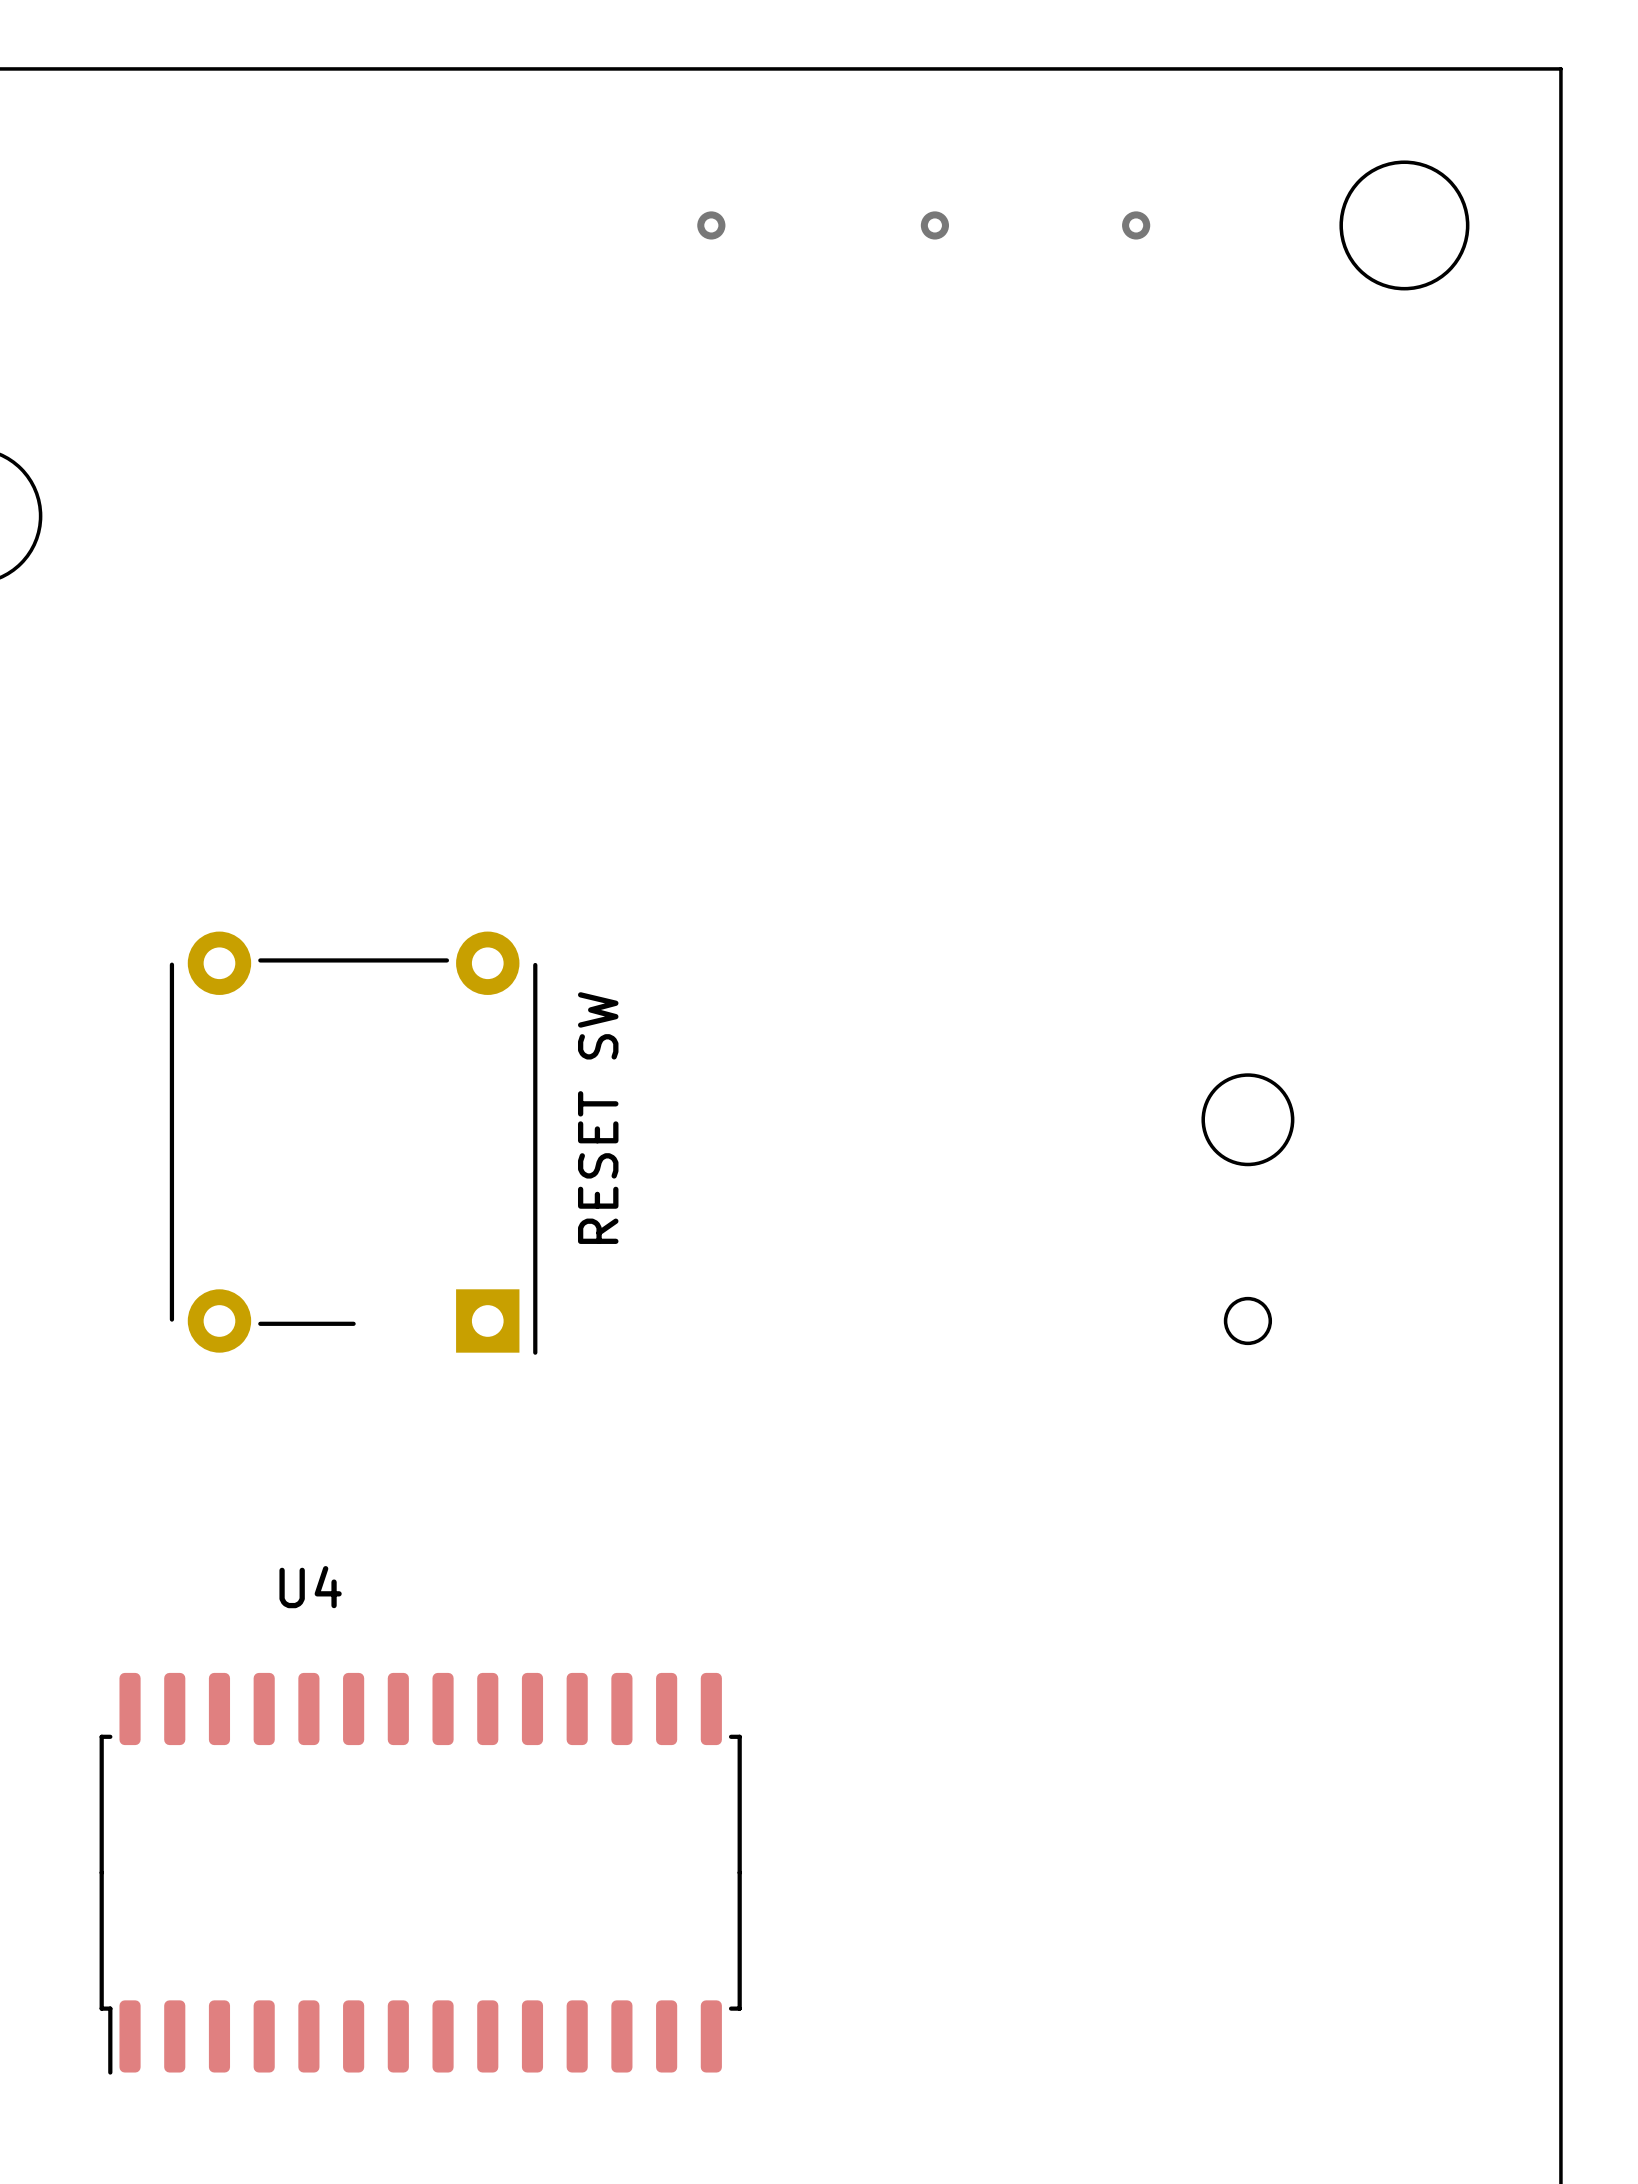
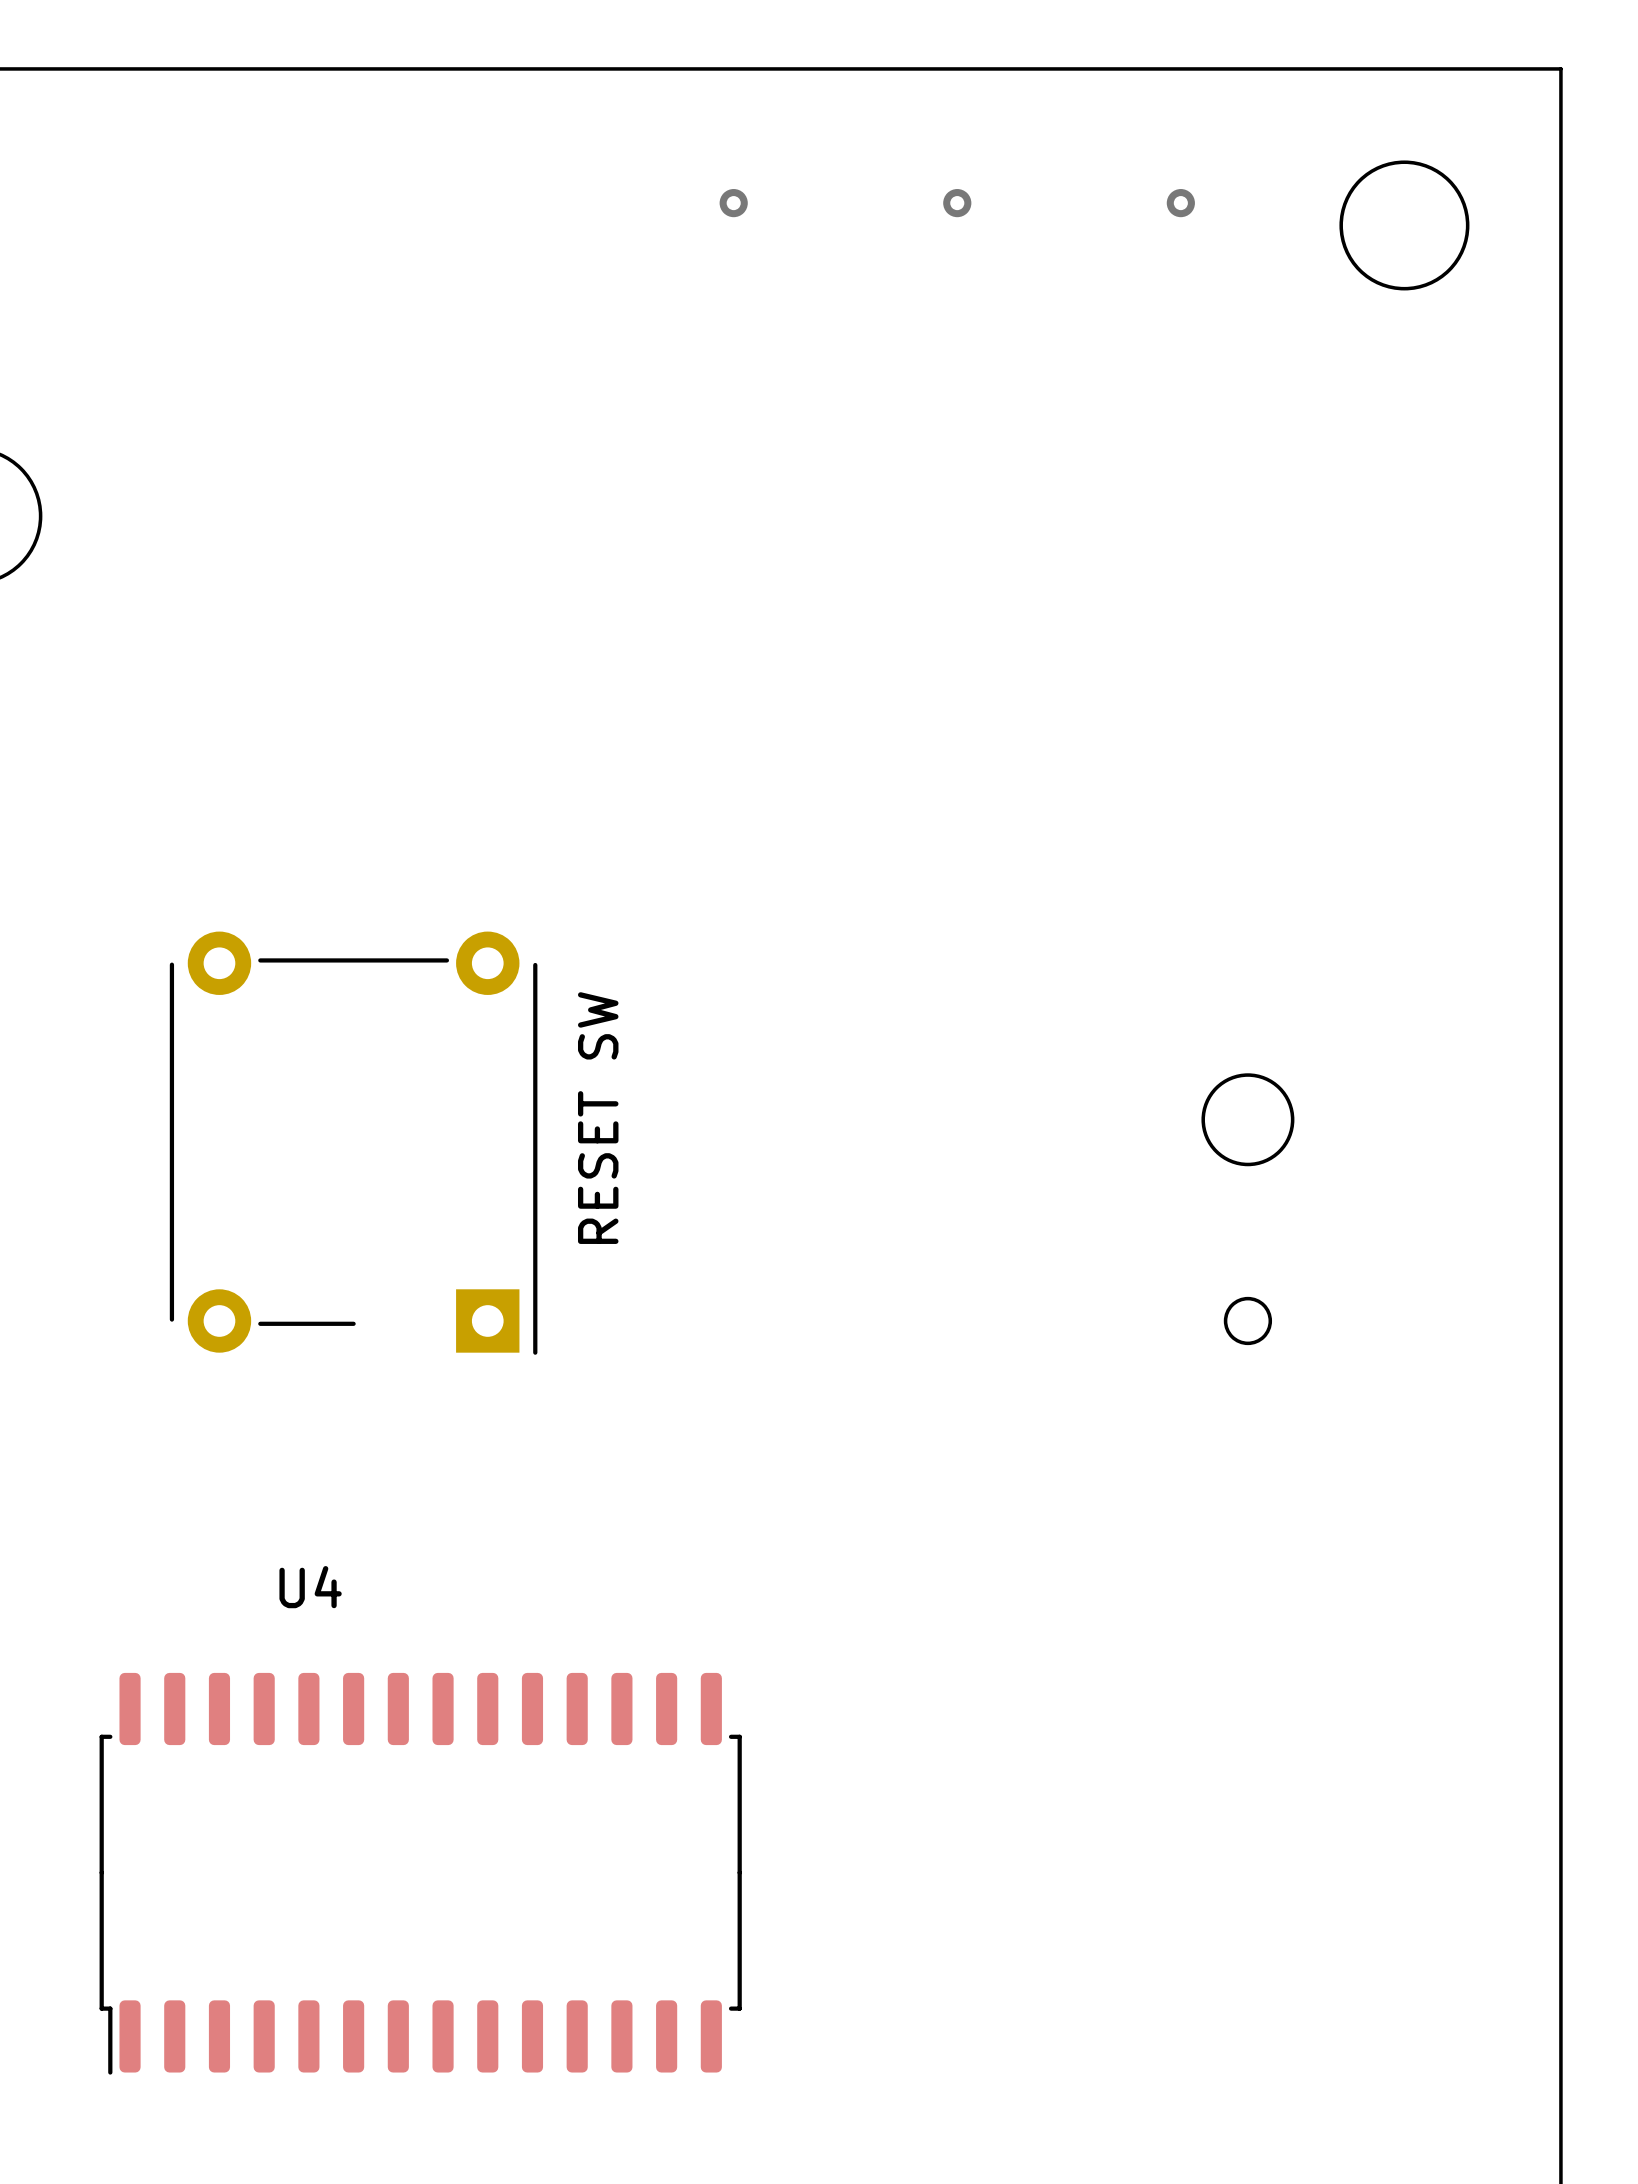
via position: (711, 225) -> (733, 203)
via position: (934, 225) -> (957, 203)
via position: (1136, 225) -> (1180, 203)

